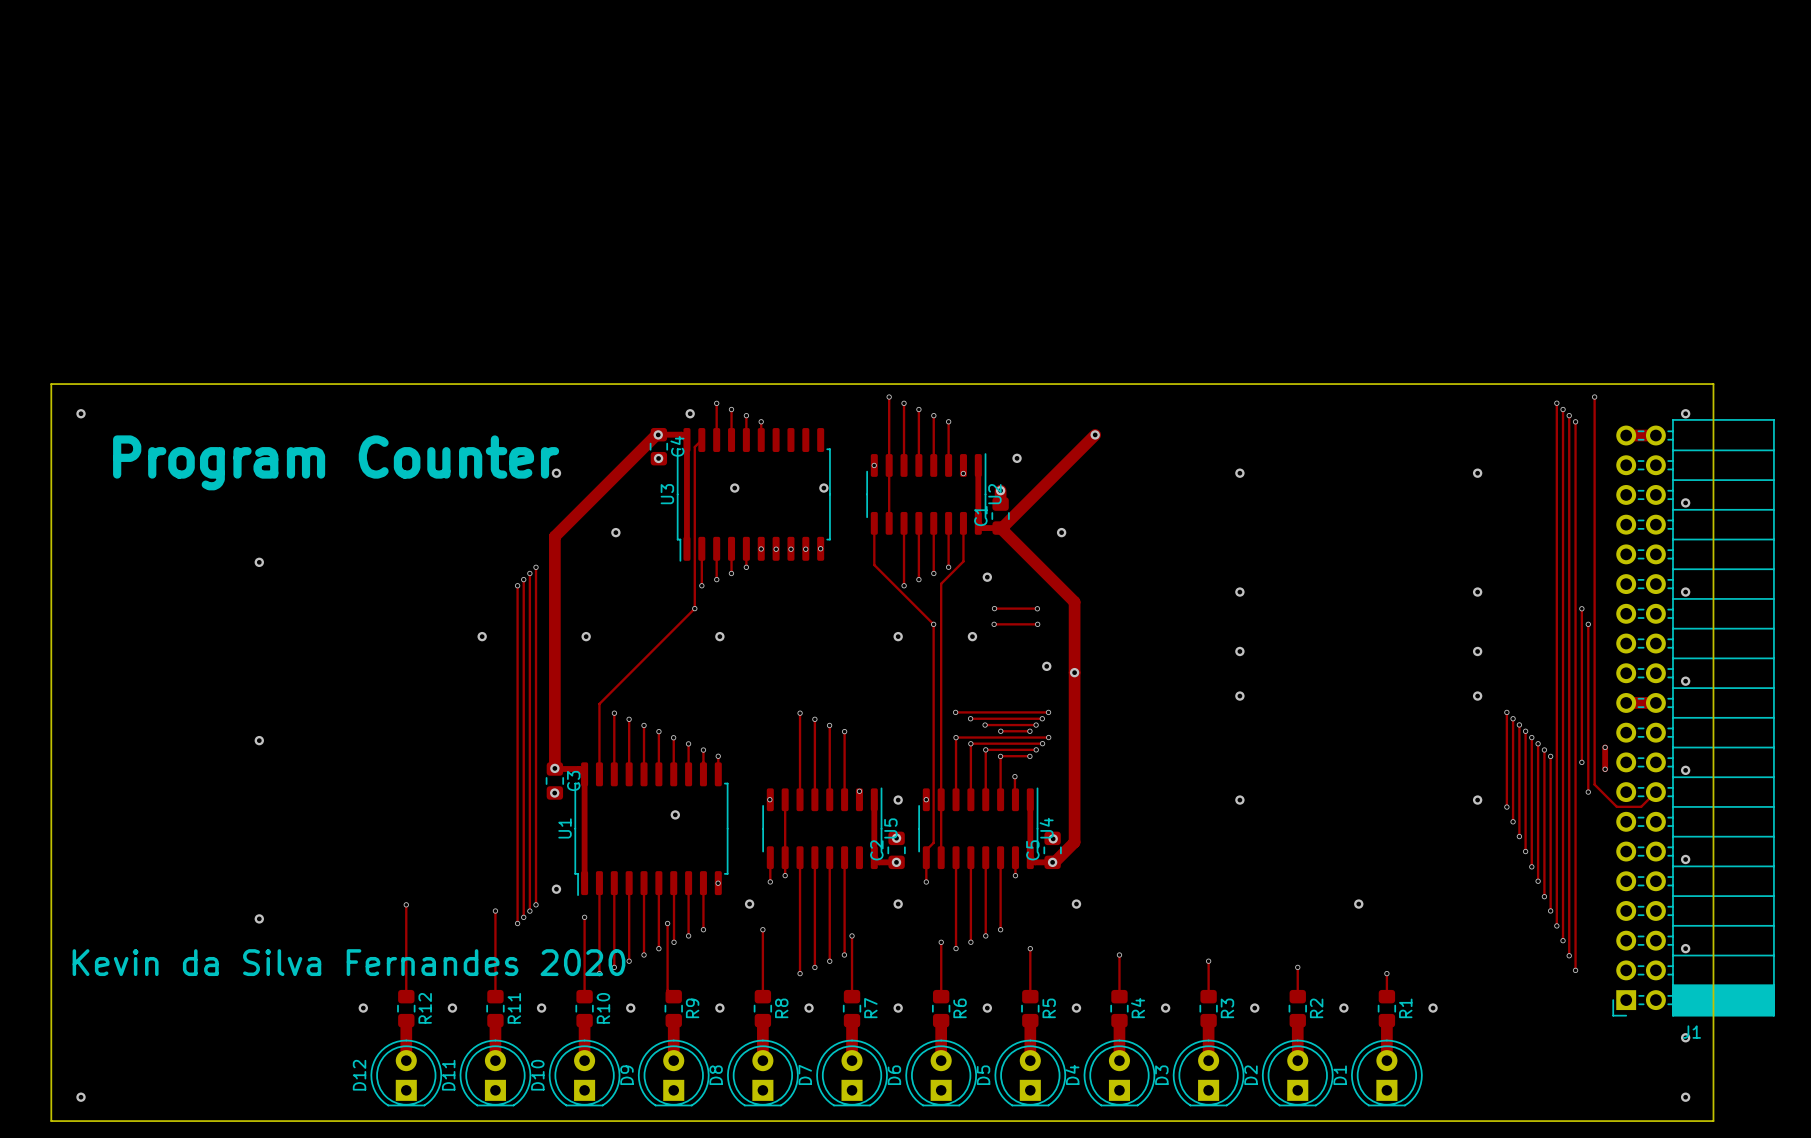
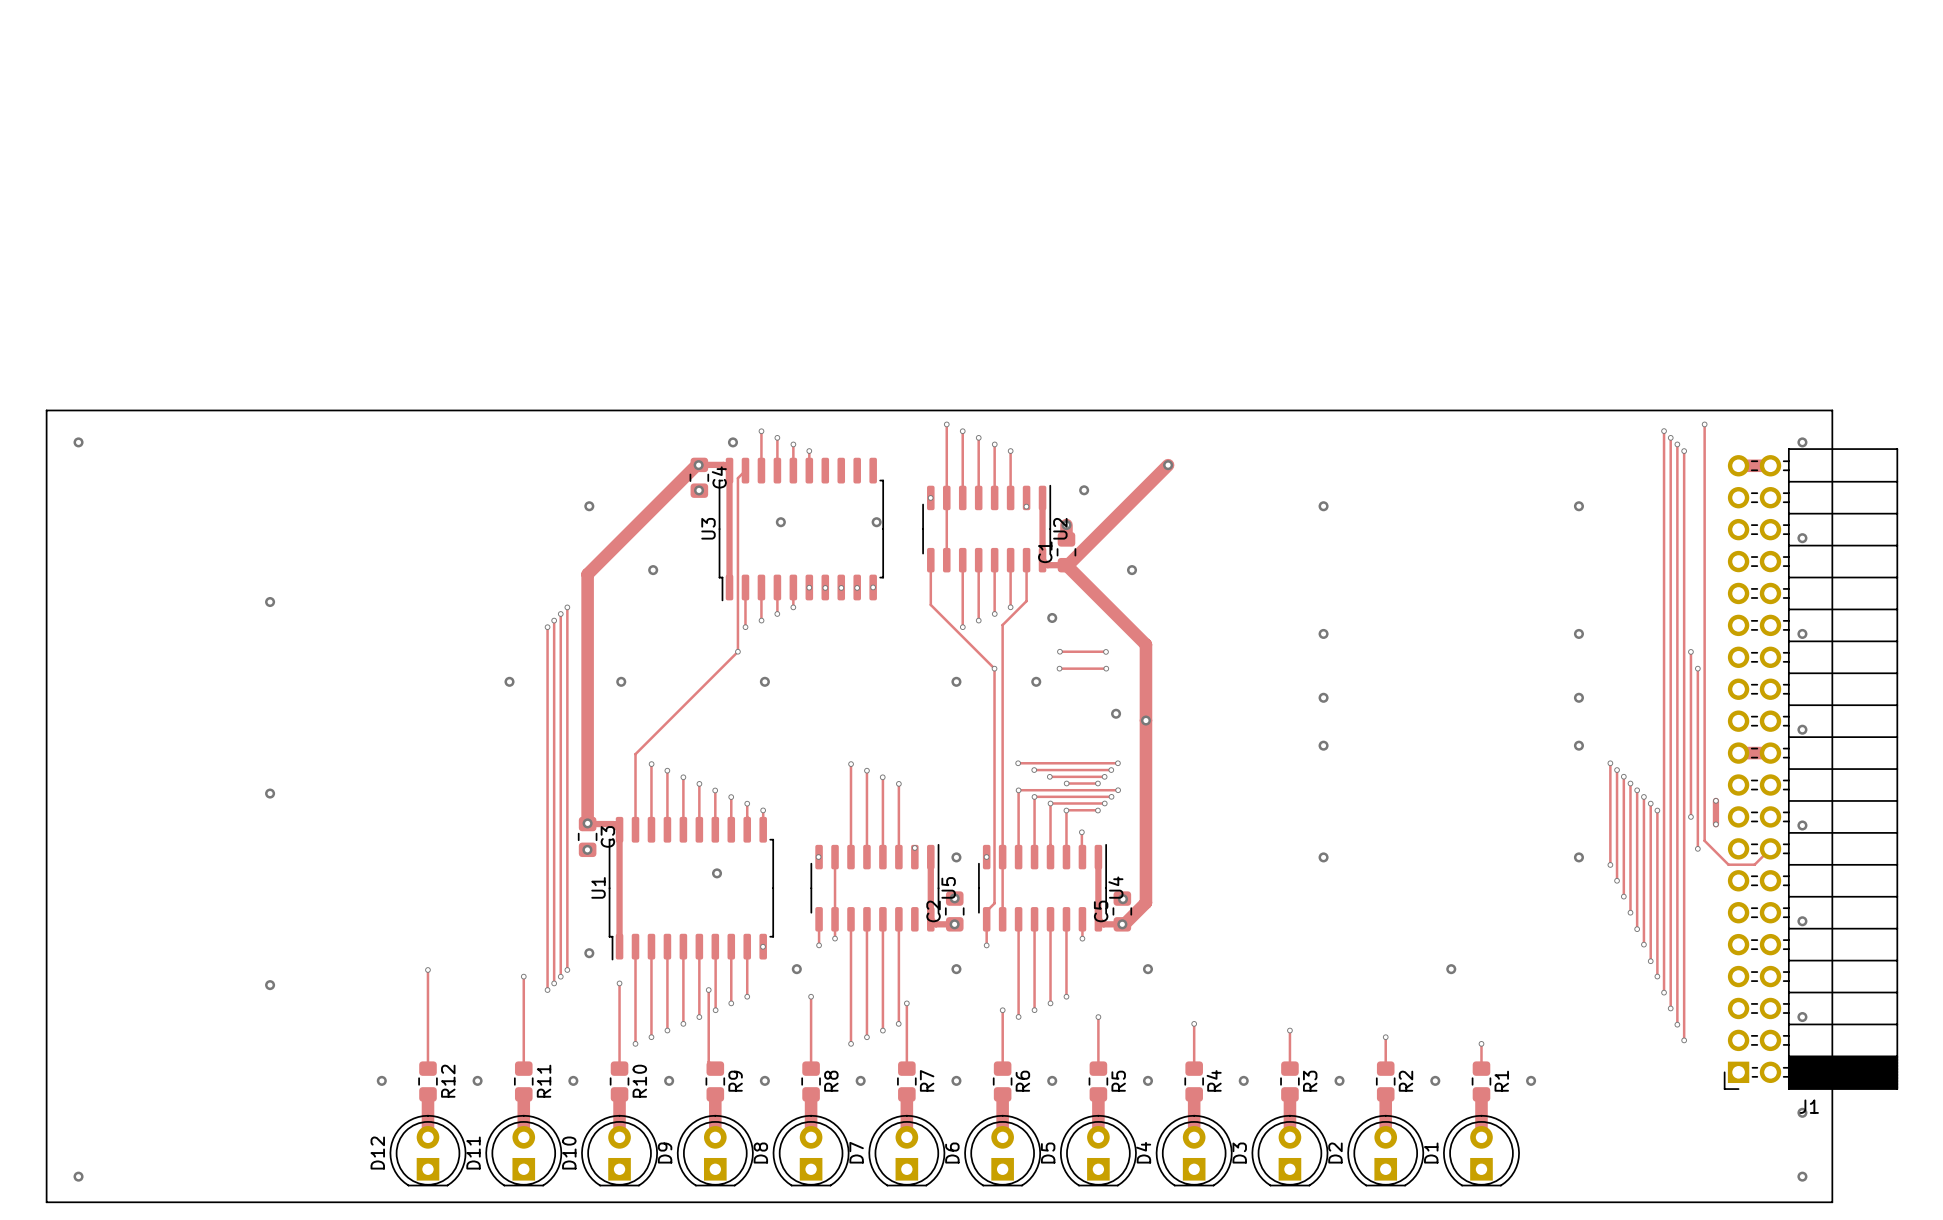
text: Program Counter (336, 462) -> none
text: Kevin da Silva Fernandes 2020 (349, 962) -> none

